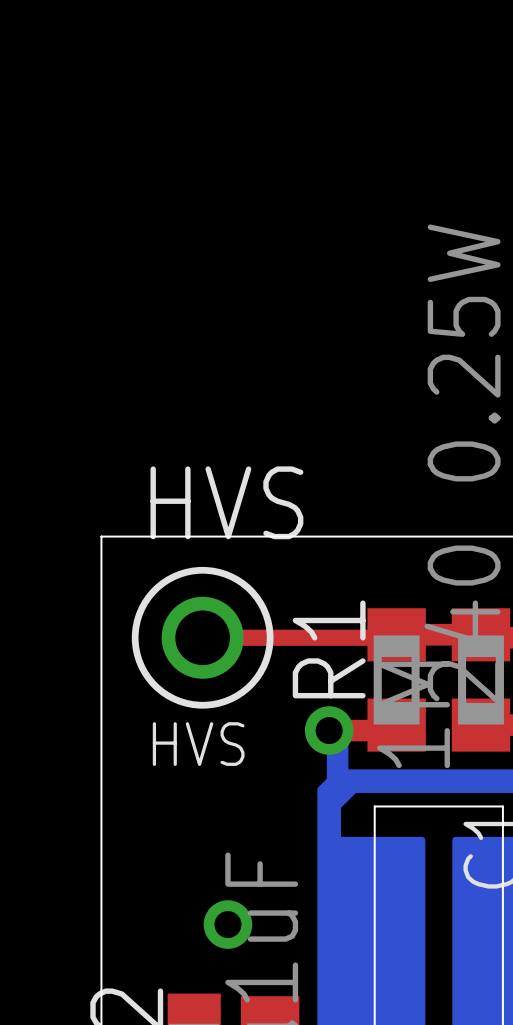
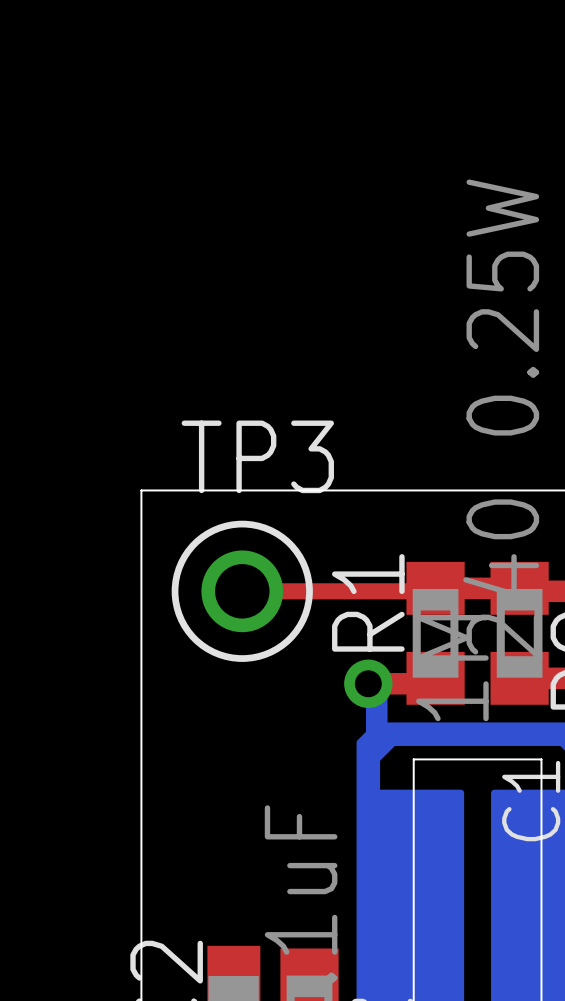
HVS name: HVS (226, 502) -> TP3 (257, 456)
text: HVS (198, 744) -> none
via: (227, 924) -> none

